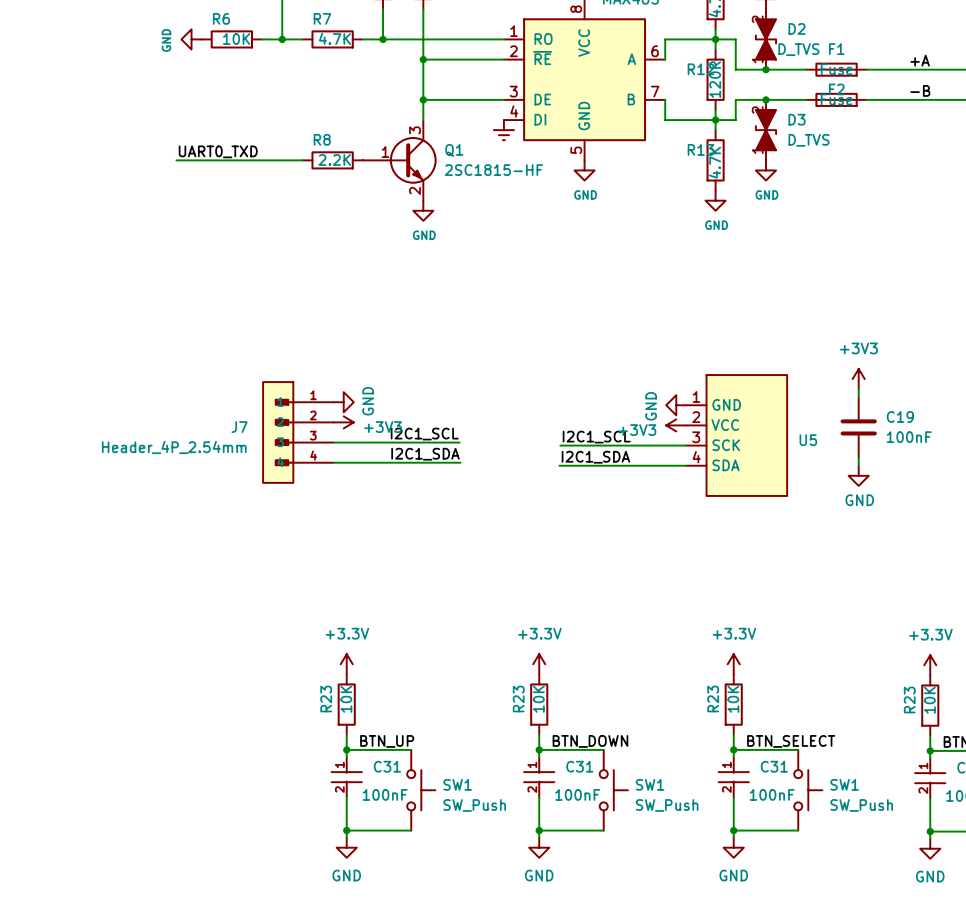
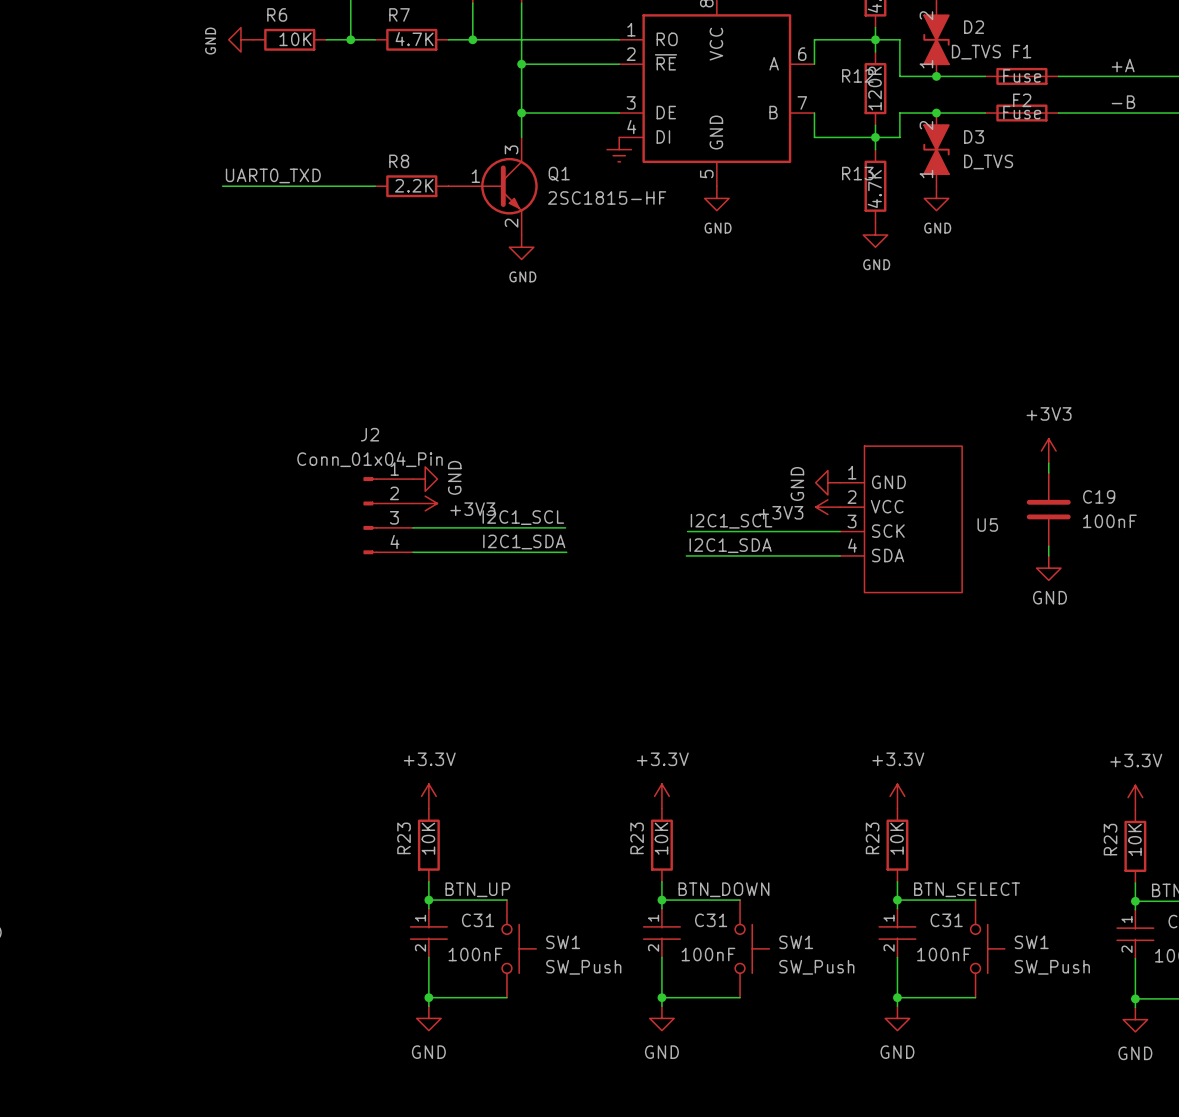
J7: Header_4P_2.54mm (298, 432) -> none
J2: none -> Conn_01x04_Pin (388, 515)

